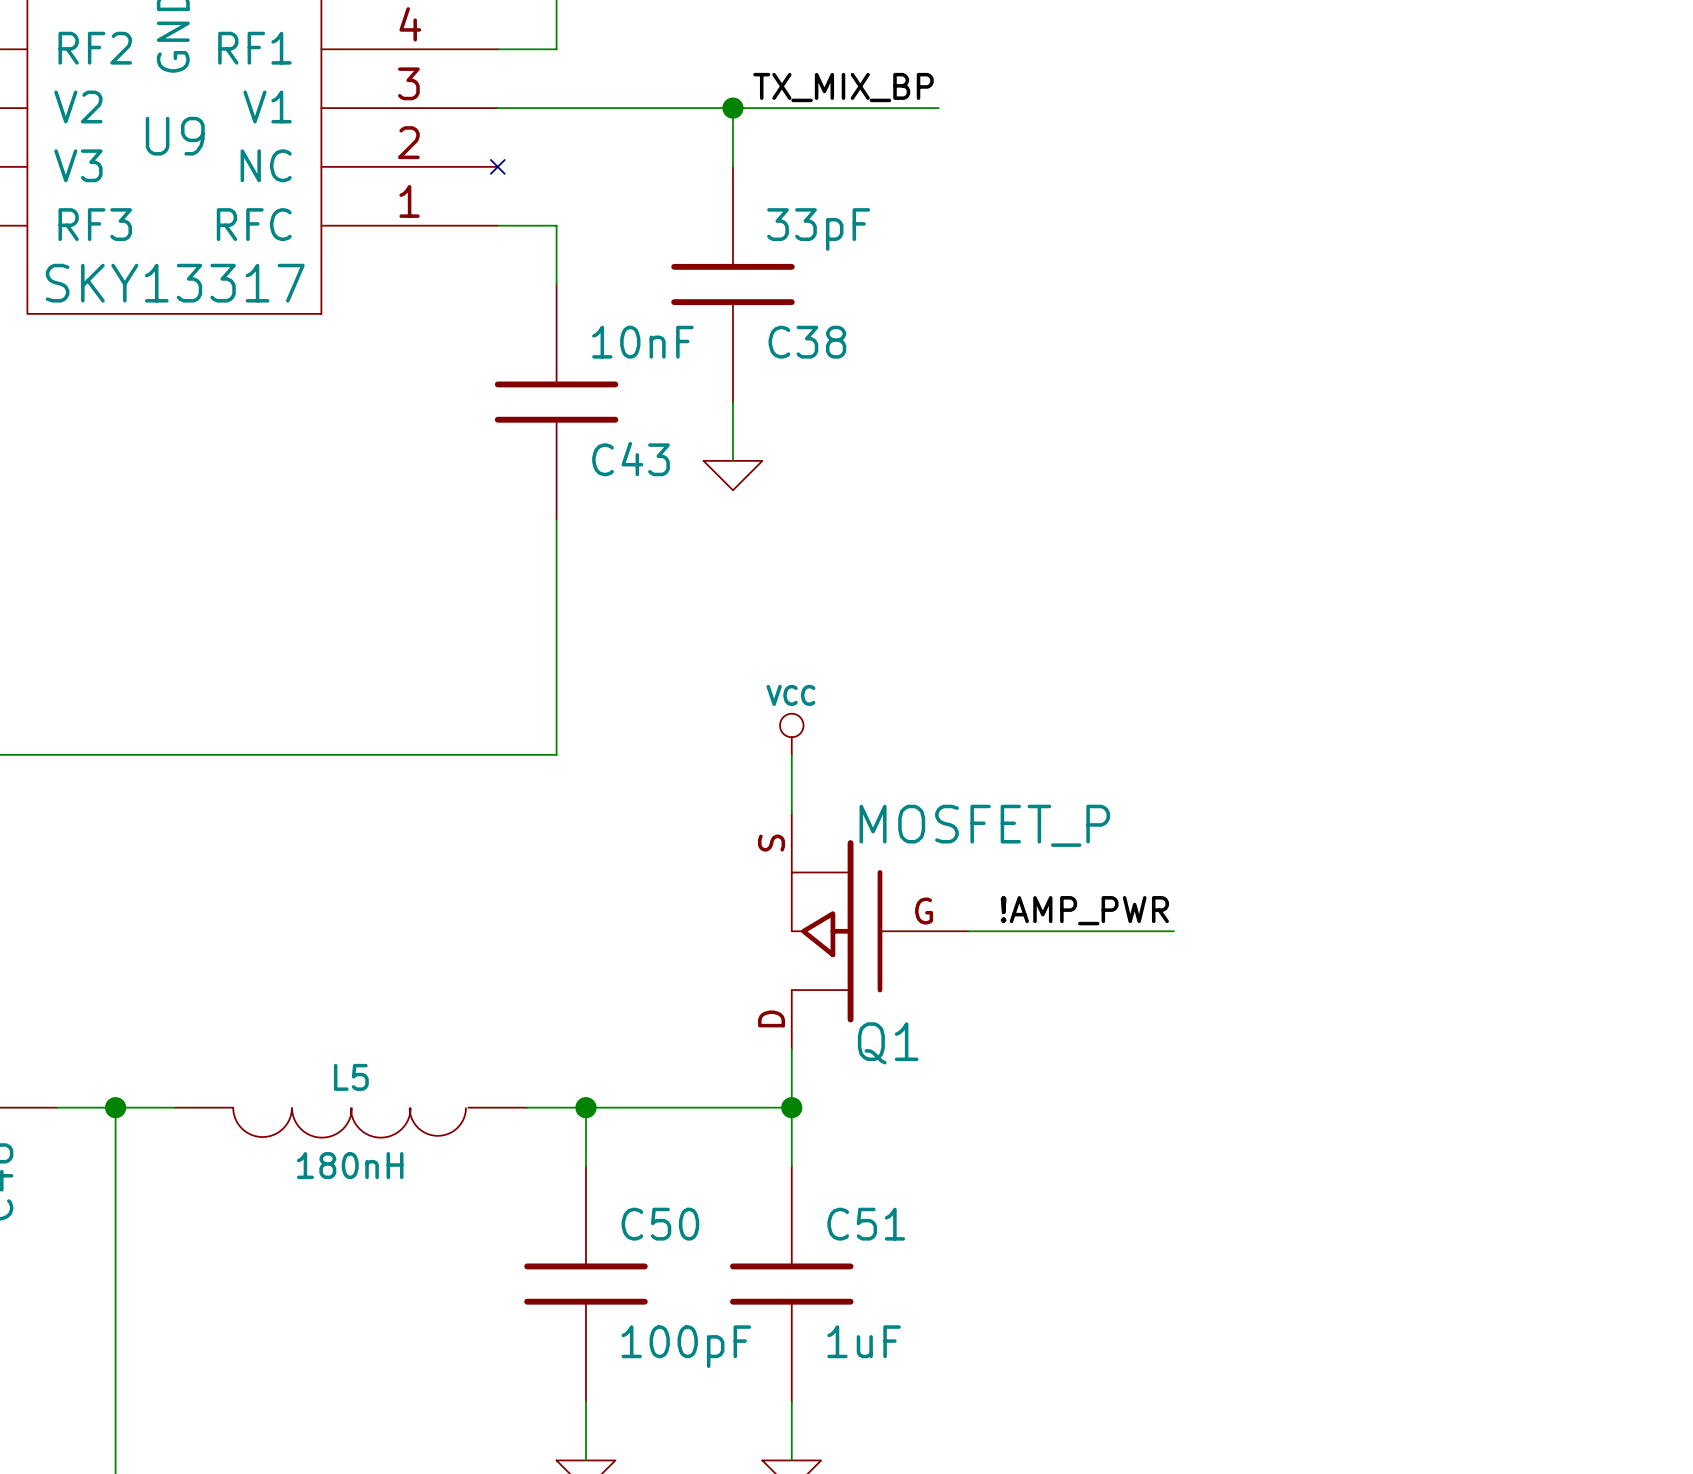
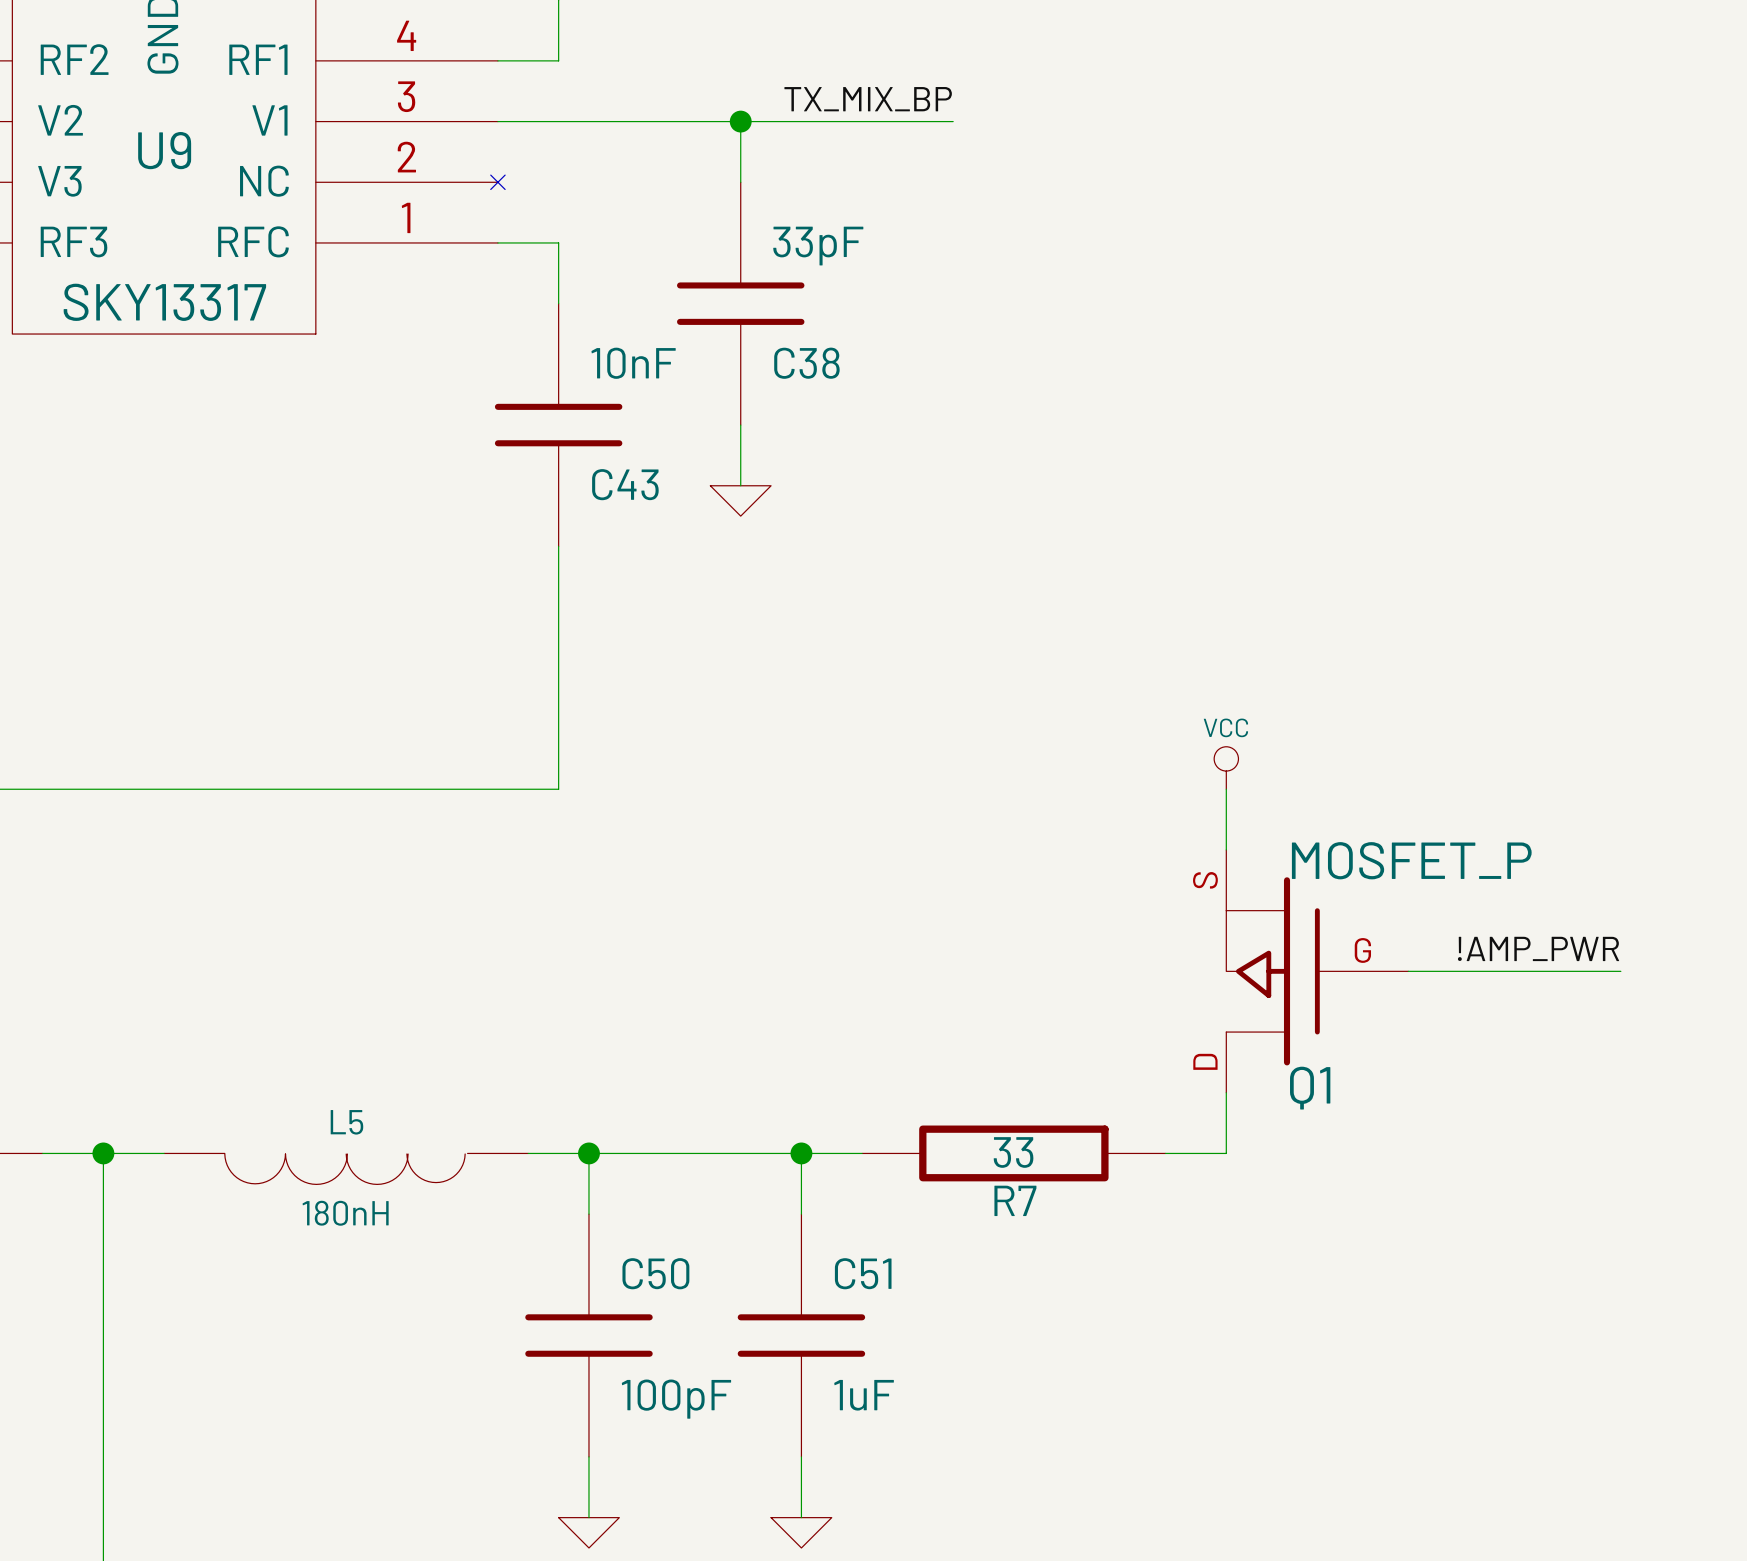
power symbol position: VCC (791, 734) -> VCC (1226, 768)
wire: (791, 754) (791, 813) -> (1226, 789) (1226, 849)
label position: !AMP_PWR (1084, 910) -> !AMP_PWR (1538, 948)
Q1 position: (879, 931) -> (1317, 971)
wire: (968, 931) (1173, 931) -> (1408, 971) (1620, 971)
wire: (791, 1048) (791, 1107) -> (862, 1153) (801, 1153)
wire: none -> (1226, 1092) (1226, 1153) (1165, 1153)
R7: none -> 33 (1013, 1153)

